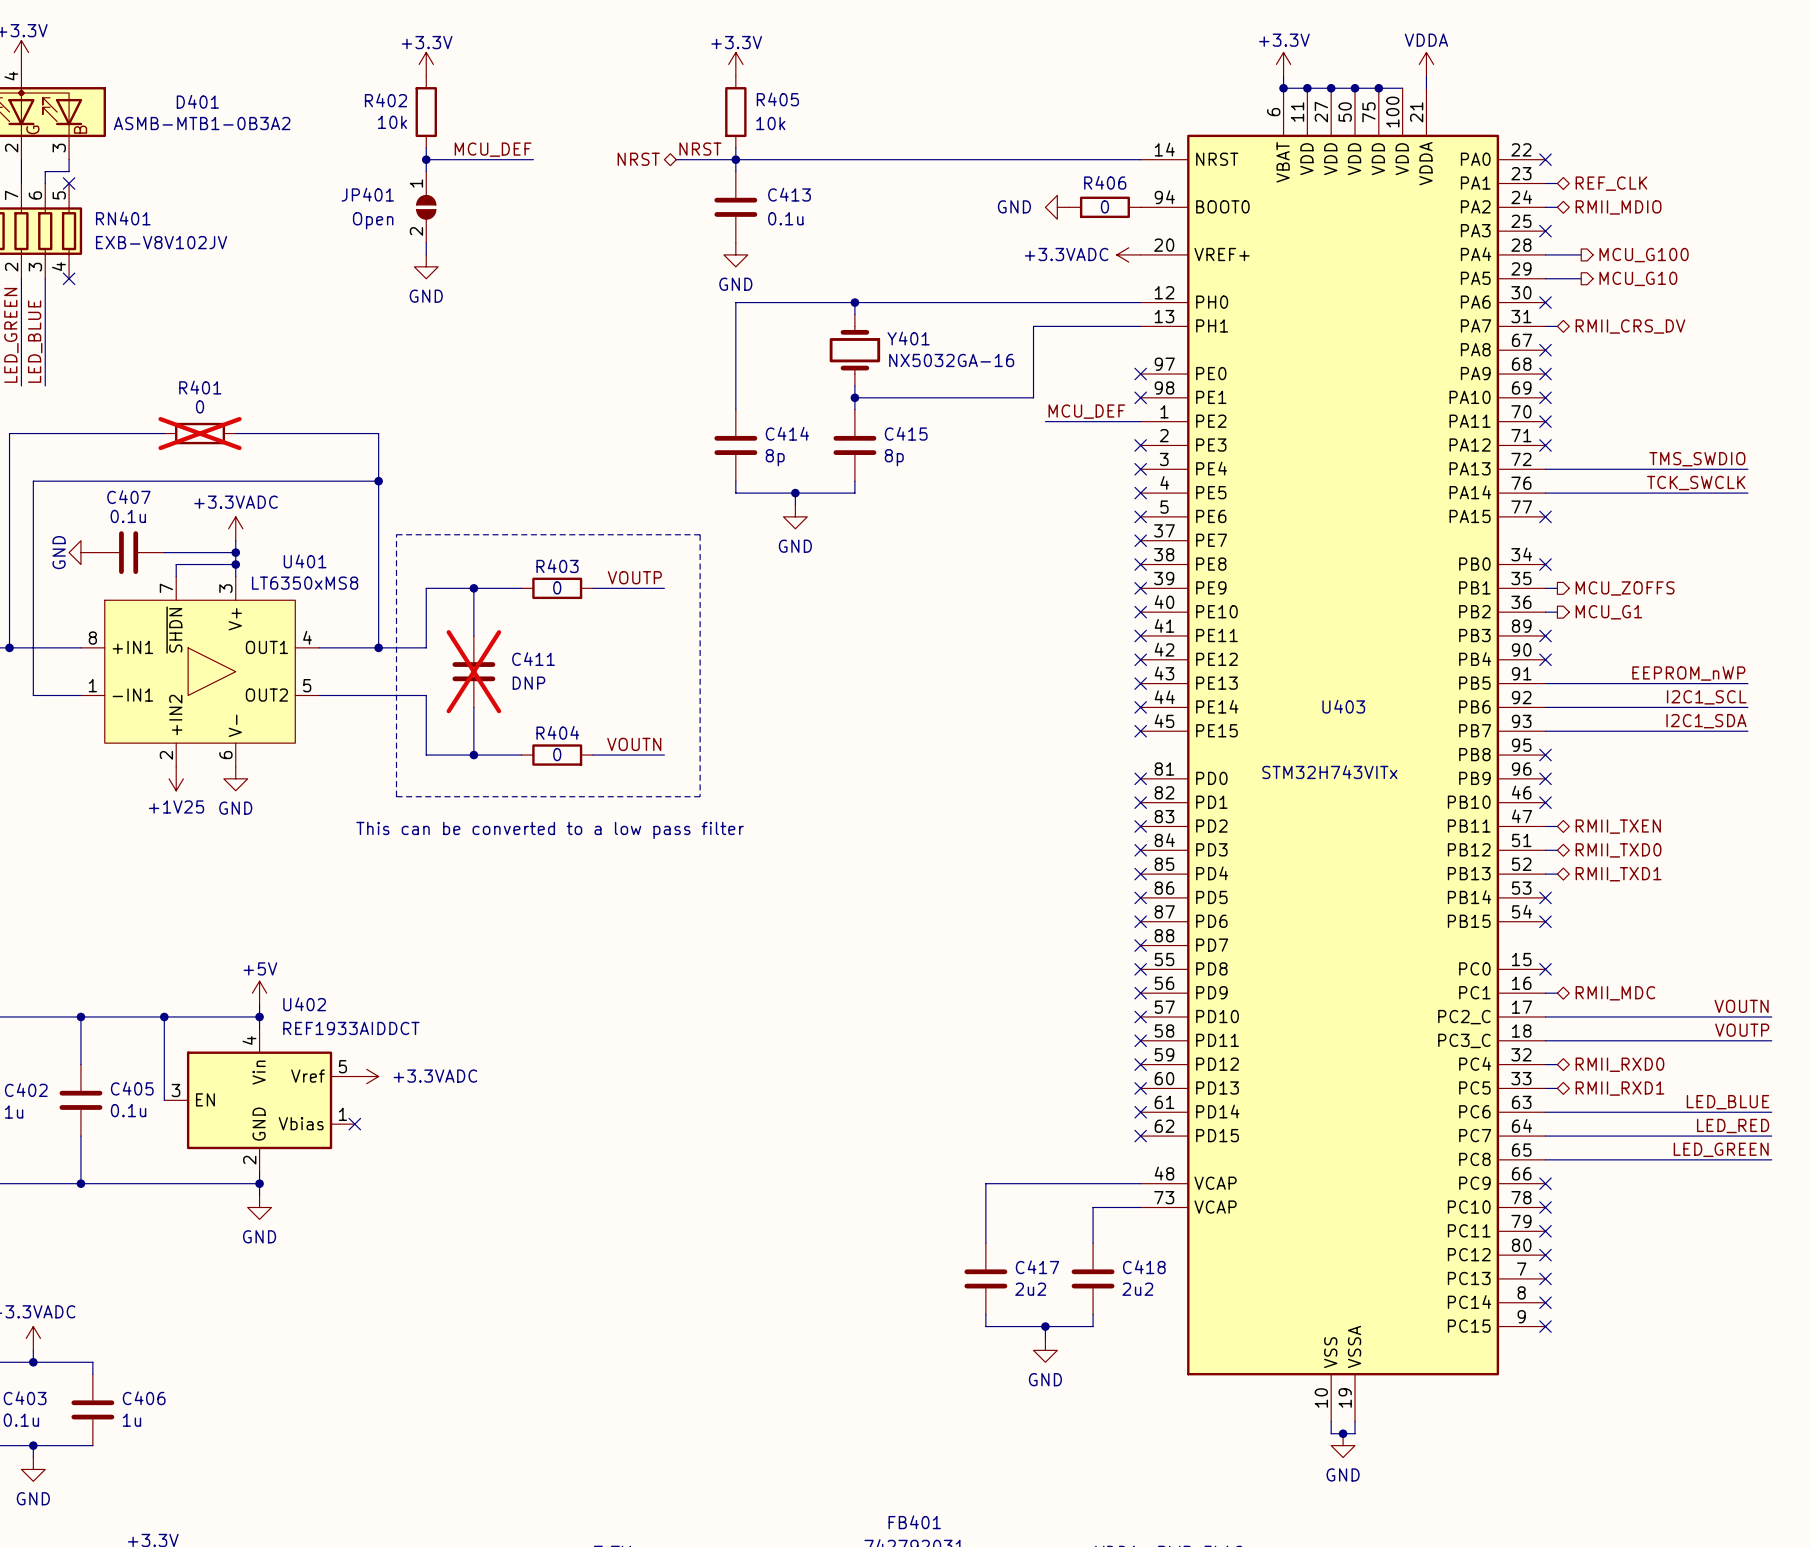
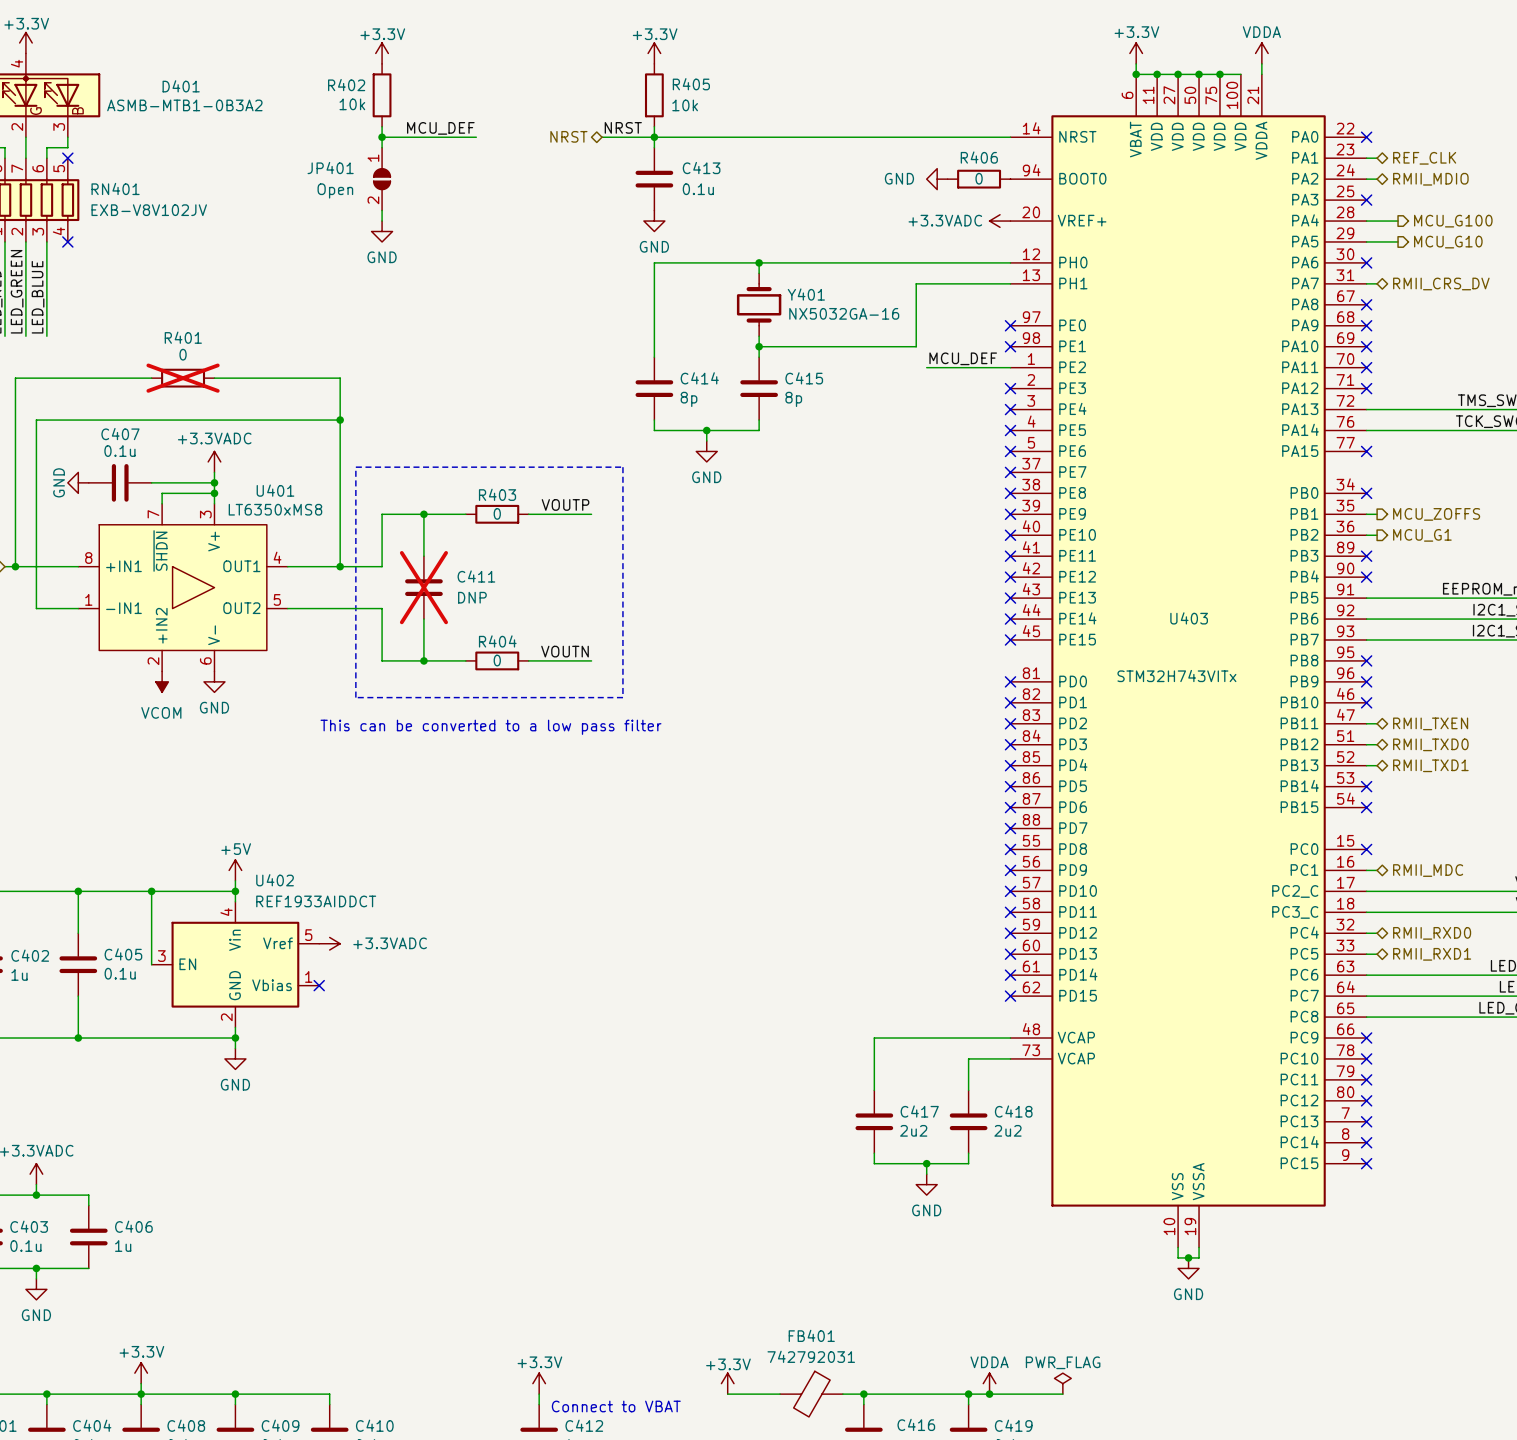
power symbol: +1V25 (176, 778) -> VCOM (162, 681)

